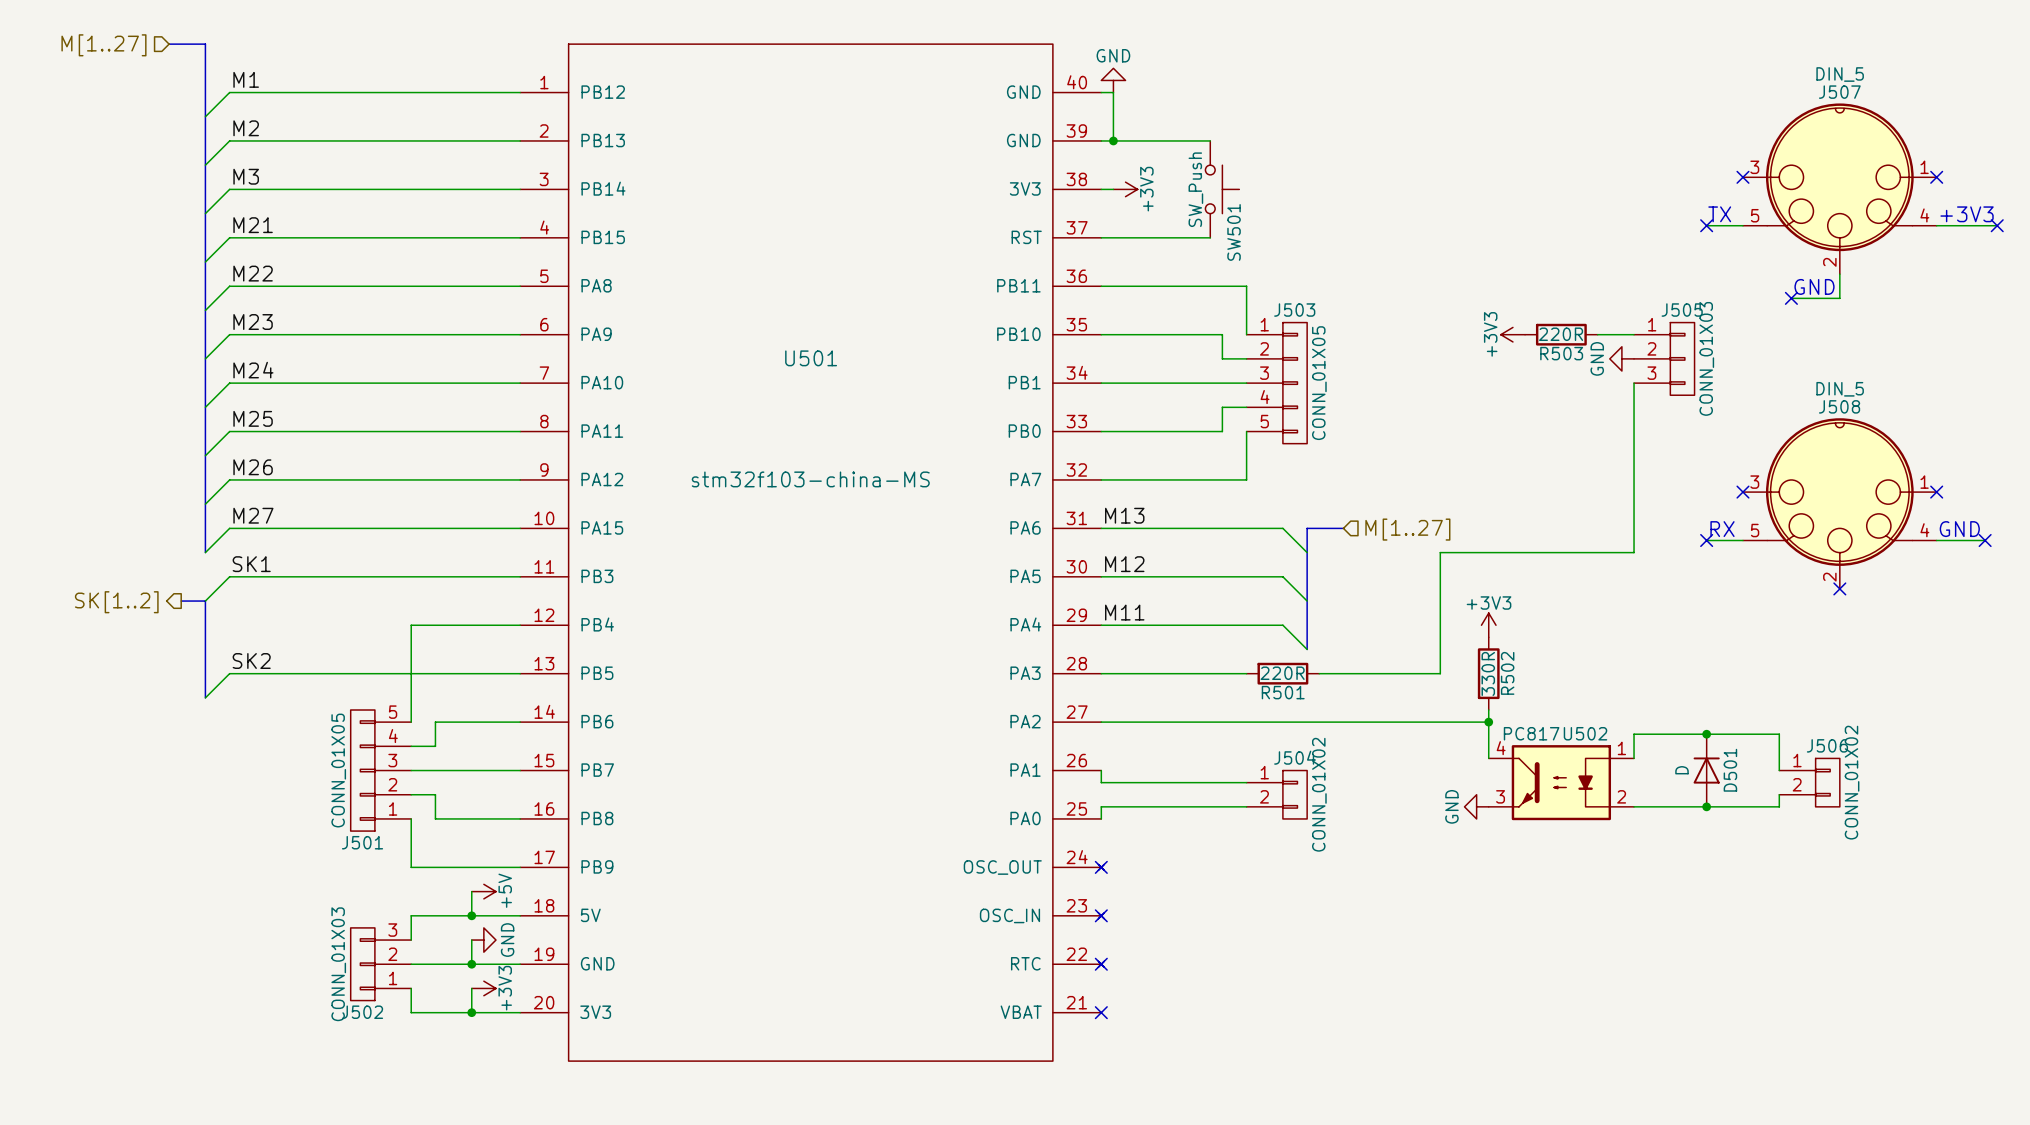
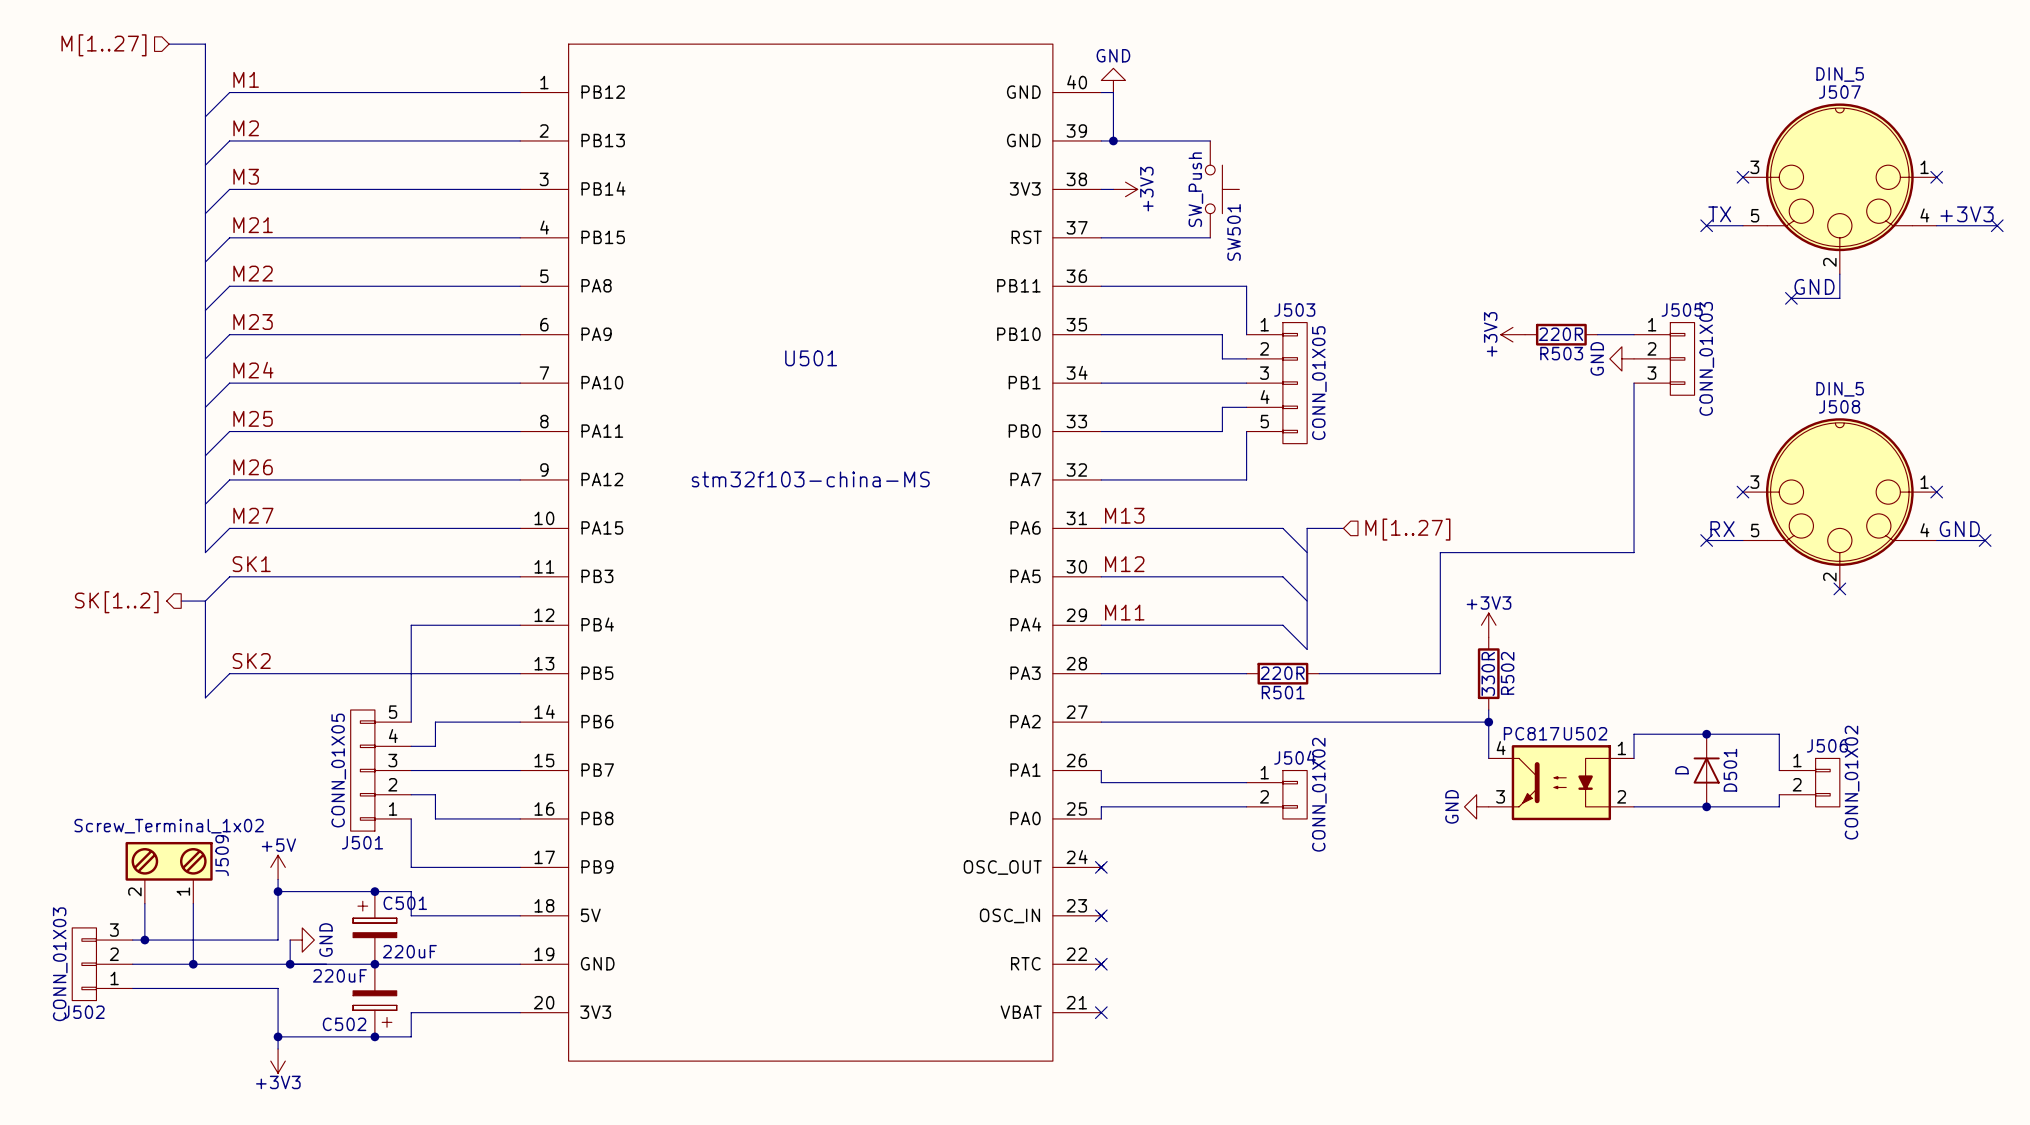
J509: none -> Screw_Terminal_1x02 (169, 872)
wire: none -> (278, 879) (278, 940) (132, 940)
junction: none -> (278, 891)
junction: none -> (374, 891)
wire: (471, 891) (471, 915) -> none
power symbol rotation: 0° (483, 891) -> 90° counterclockwise (278, 867)
power symbol position: +5V (483, 891) -> +5V (278, 867)
wire: none -> (144, 903) (144, 940)
wire: none -> (193, 903) (193, 964)
wire: (411, 915) (411, 940) -> (411, 915) (411, 891) (278, 891)
junction: (471, 915) -> none
C501: none -> 220uF (374, 927)
junction: none -> (144, 940)
wire: (471, 940) (471, 964) -> (290, 940) (290, 964)
power symbol position: GND (483, 940) -> GND (302, 940)
wire: none -> (132, 964) (411, 964)
junction: none -> (193, 964)
junction: none -> (290, 964)
junction: none -> (374, 964)
J502 position: (380, 964) -> (102, 964)
junction: (471, 964) -> none
wire: none -> (132, 988) (278, 988) (278, 1048)
wire: (411, 988) (411, 1012) -> (278, 1036) (411, 1036) (411, 1012)
wire: (471, 988) (471, 1012) -> none
power symbol rotation: 0° (483, 988) -> 90° clockwise (278, 1061)
power symbol position: +3V3 (483, 988) -> +3V3 (278, 1061)
C502: none -> 220uF (374, 1000)
junction: (471, 1012) -> none
junction: none -> (278, 1036)
junction: none -> (374, 1036)

